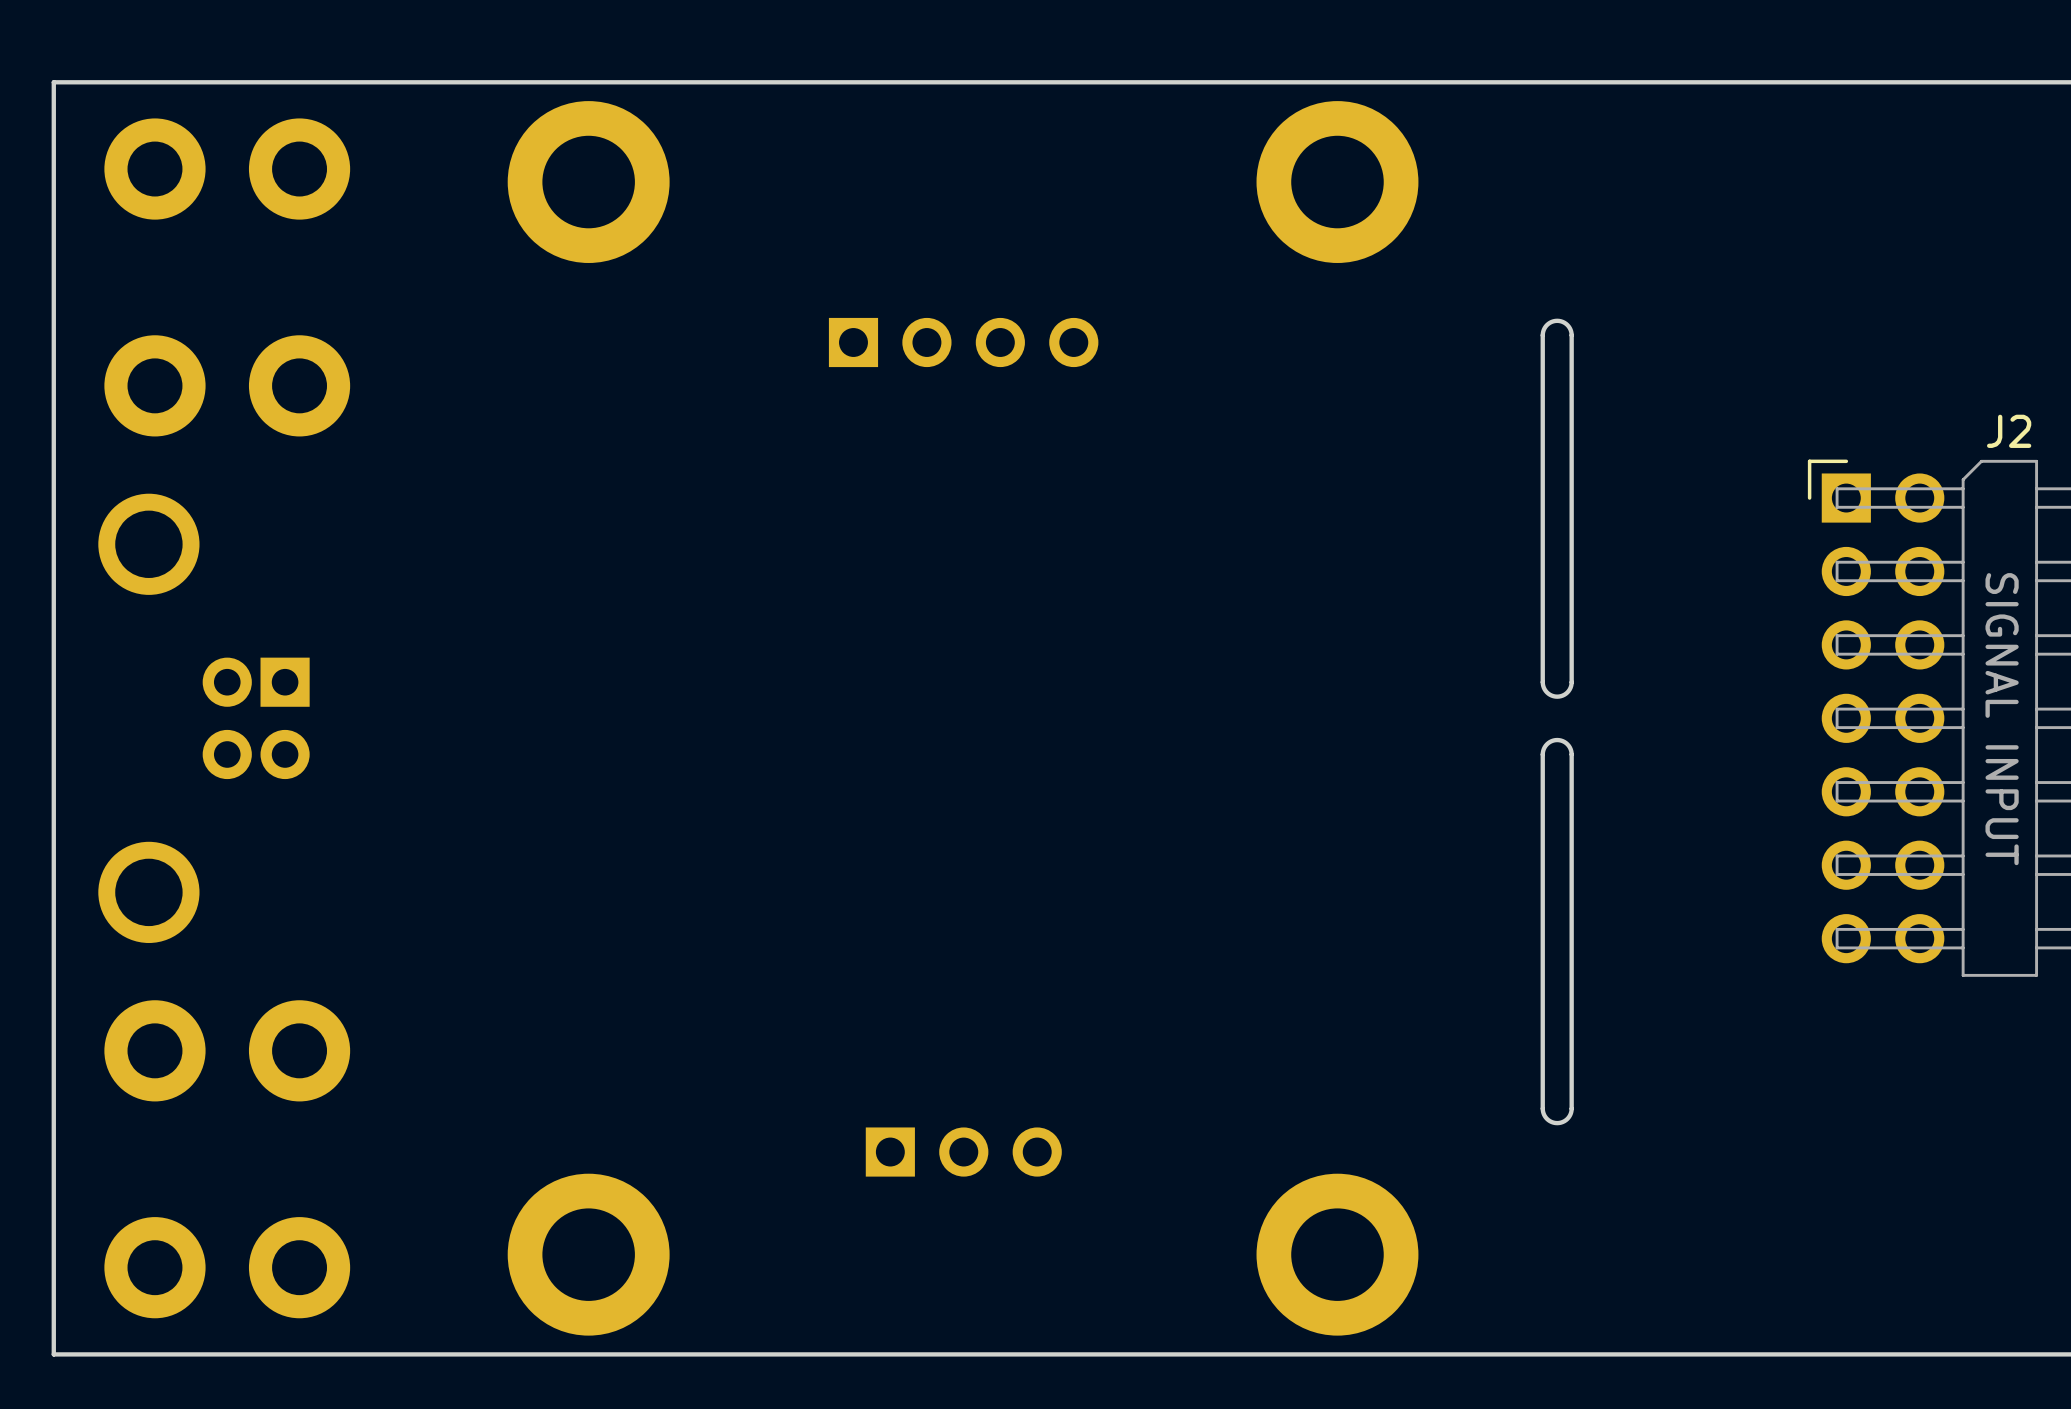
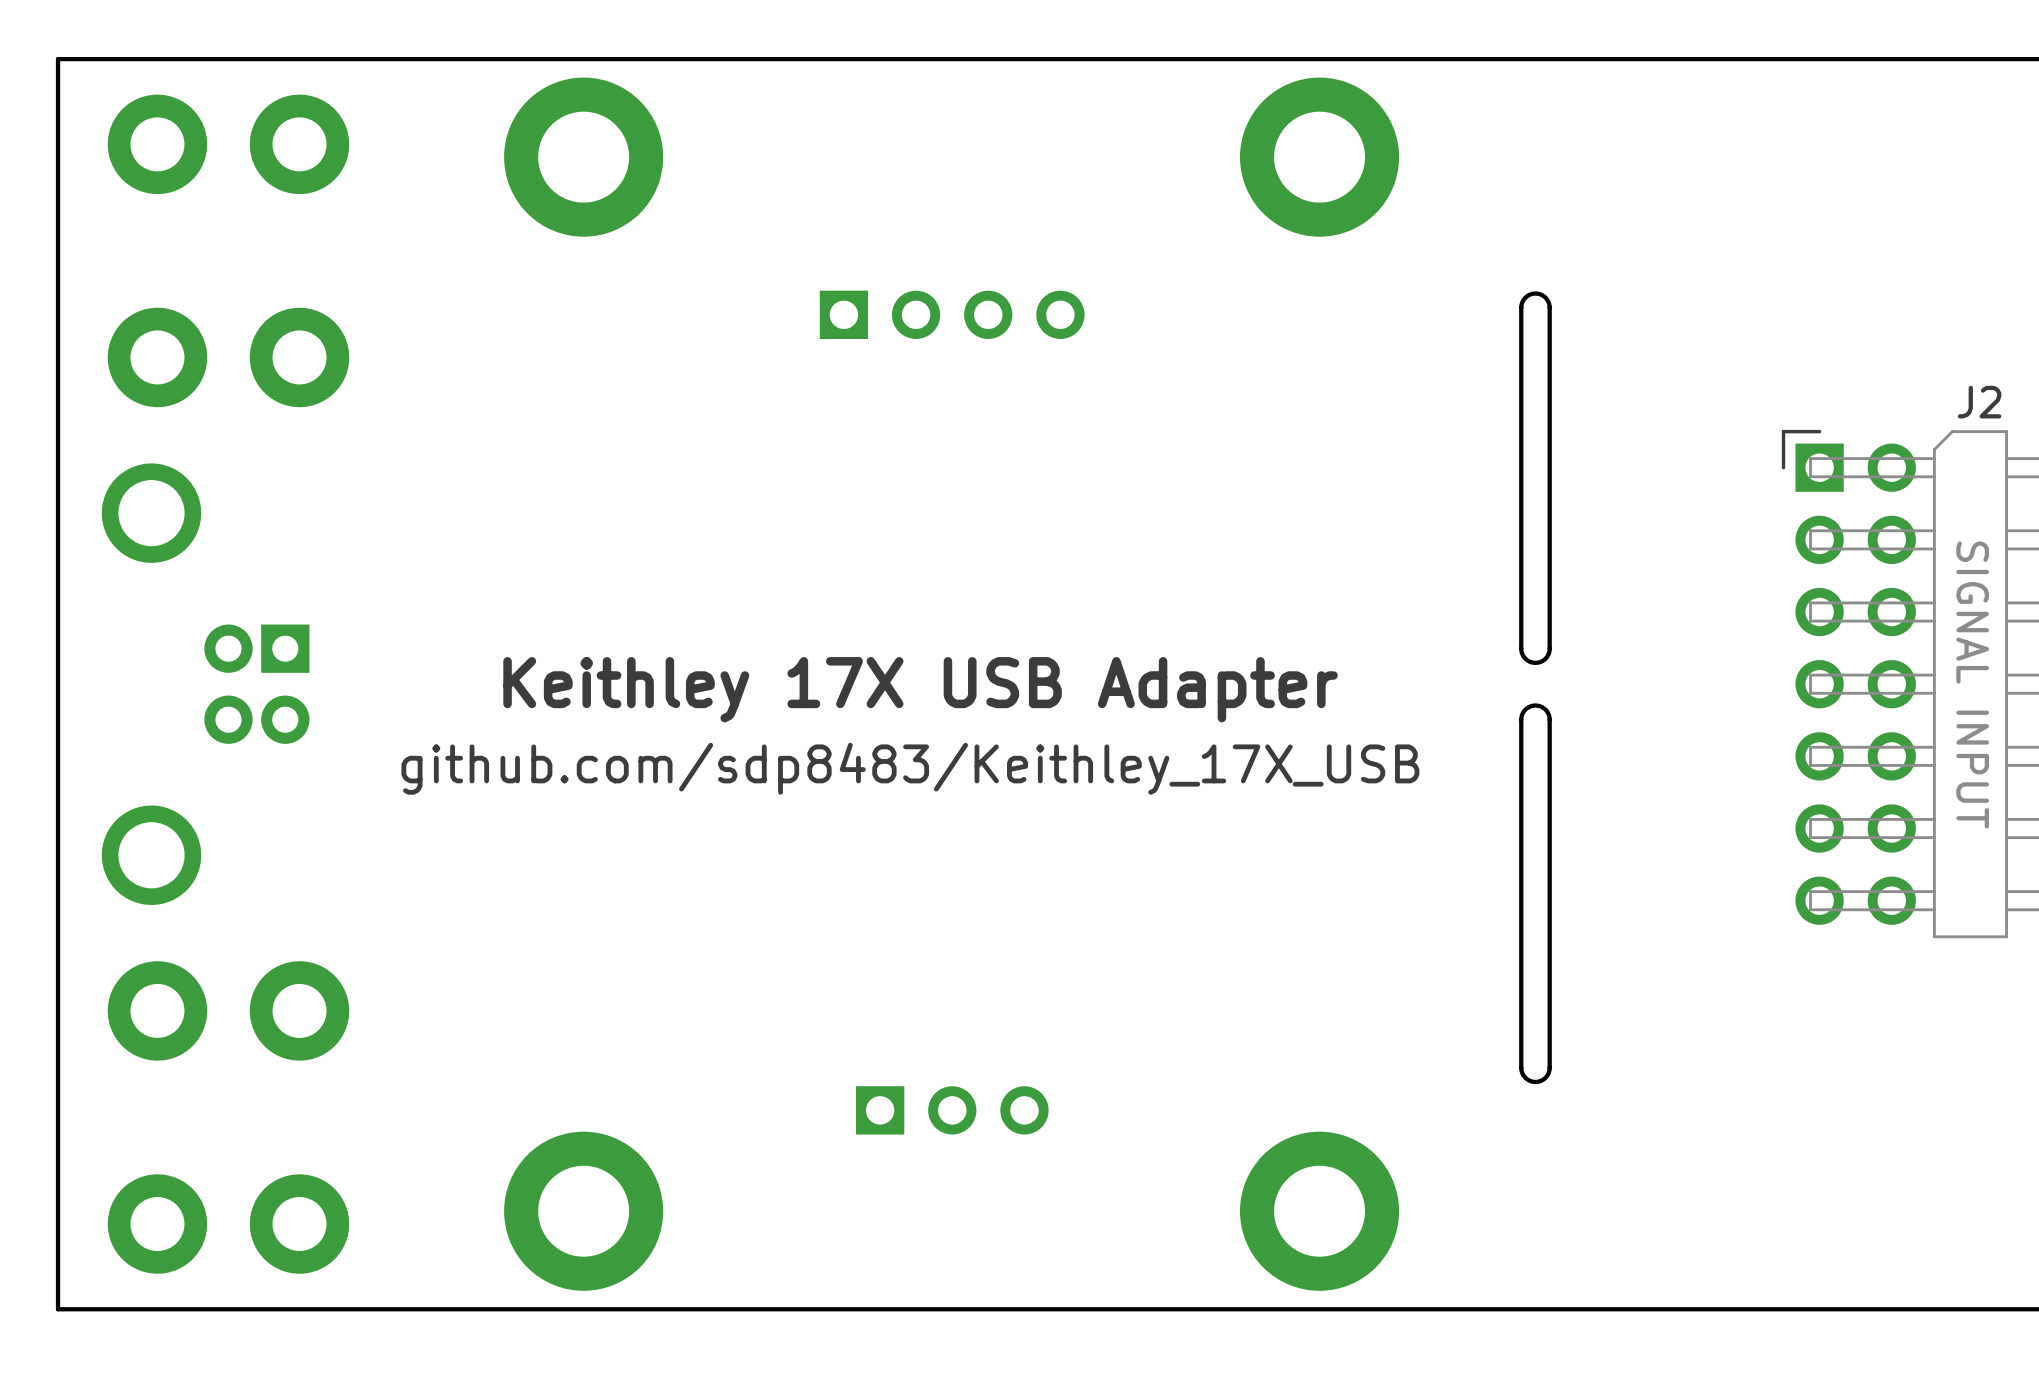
text: none -> Keithley 17X USB Adapter (920, 689)
text: none -> github.com/sdp8483/Keithley_17X_USB (910, 768)

